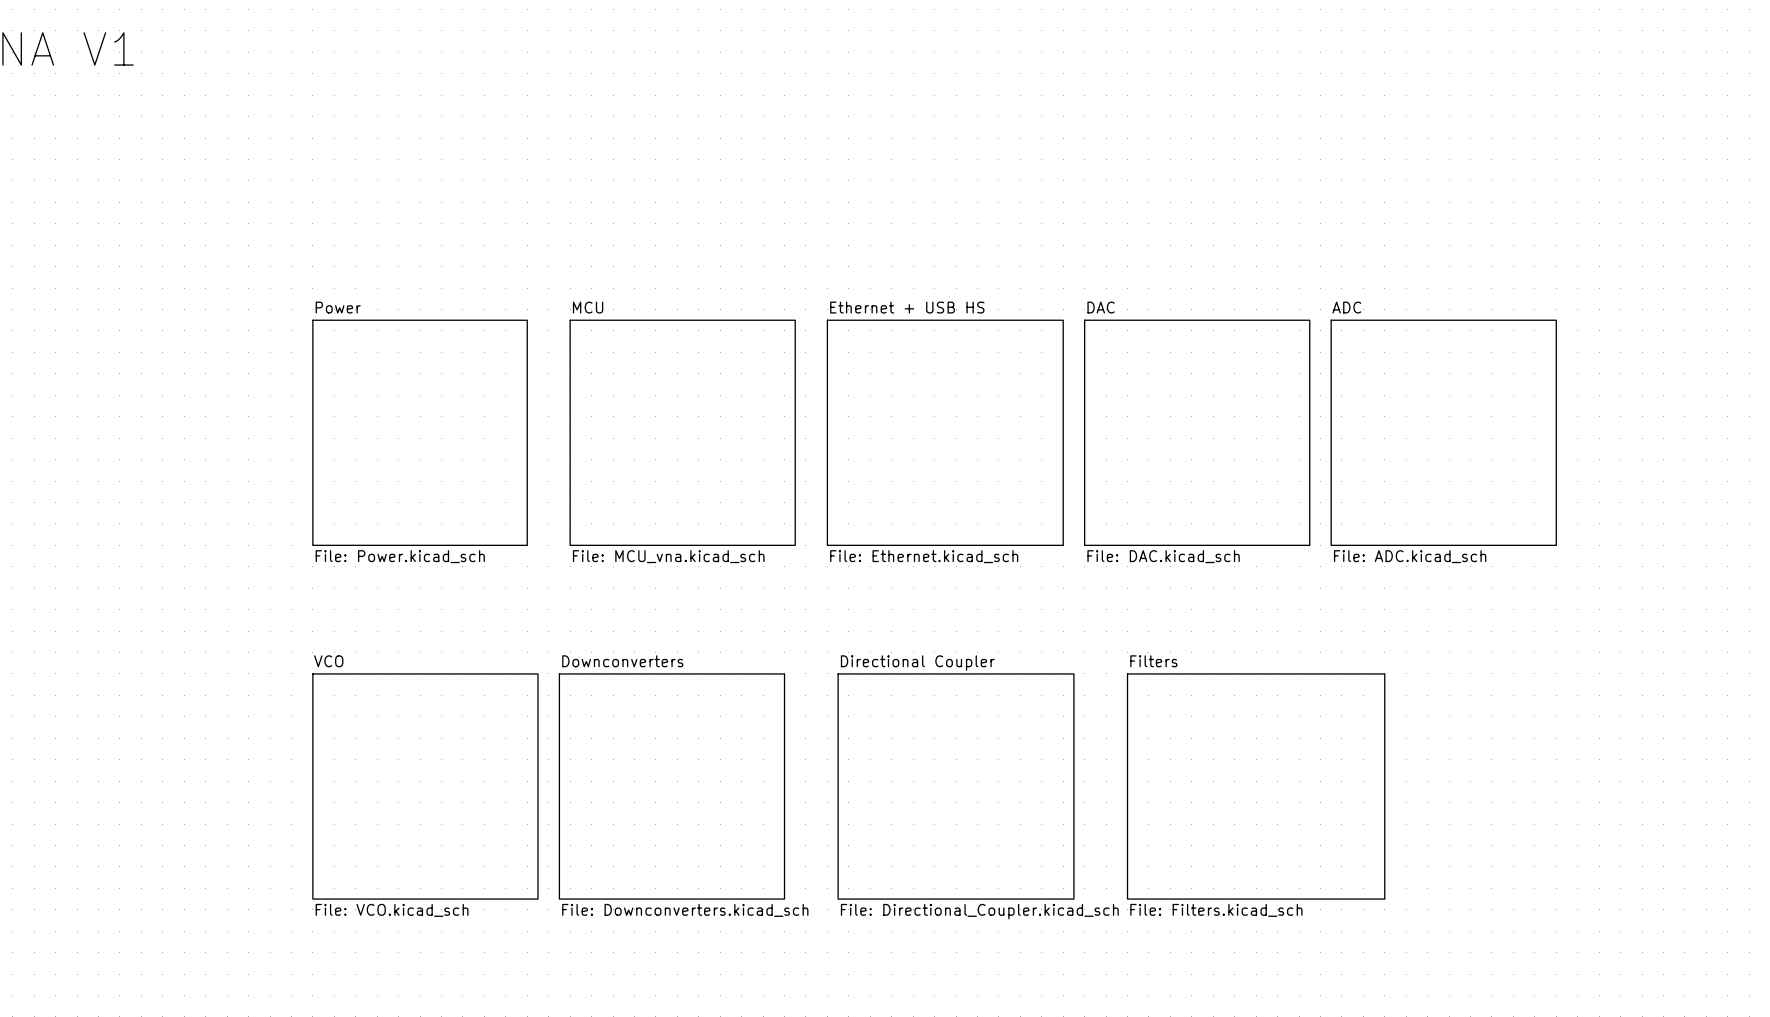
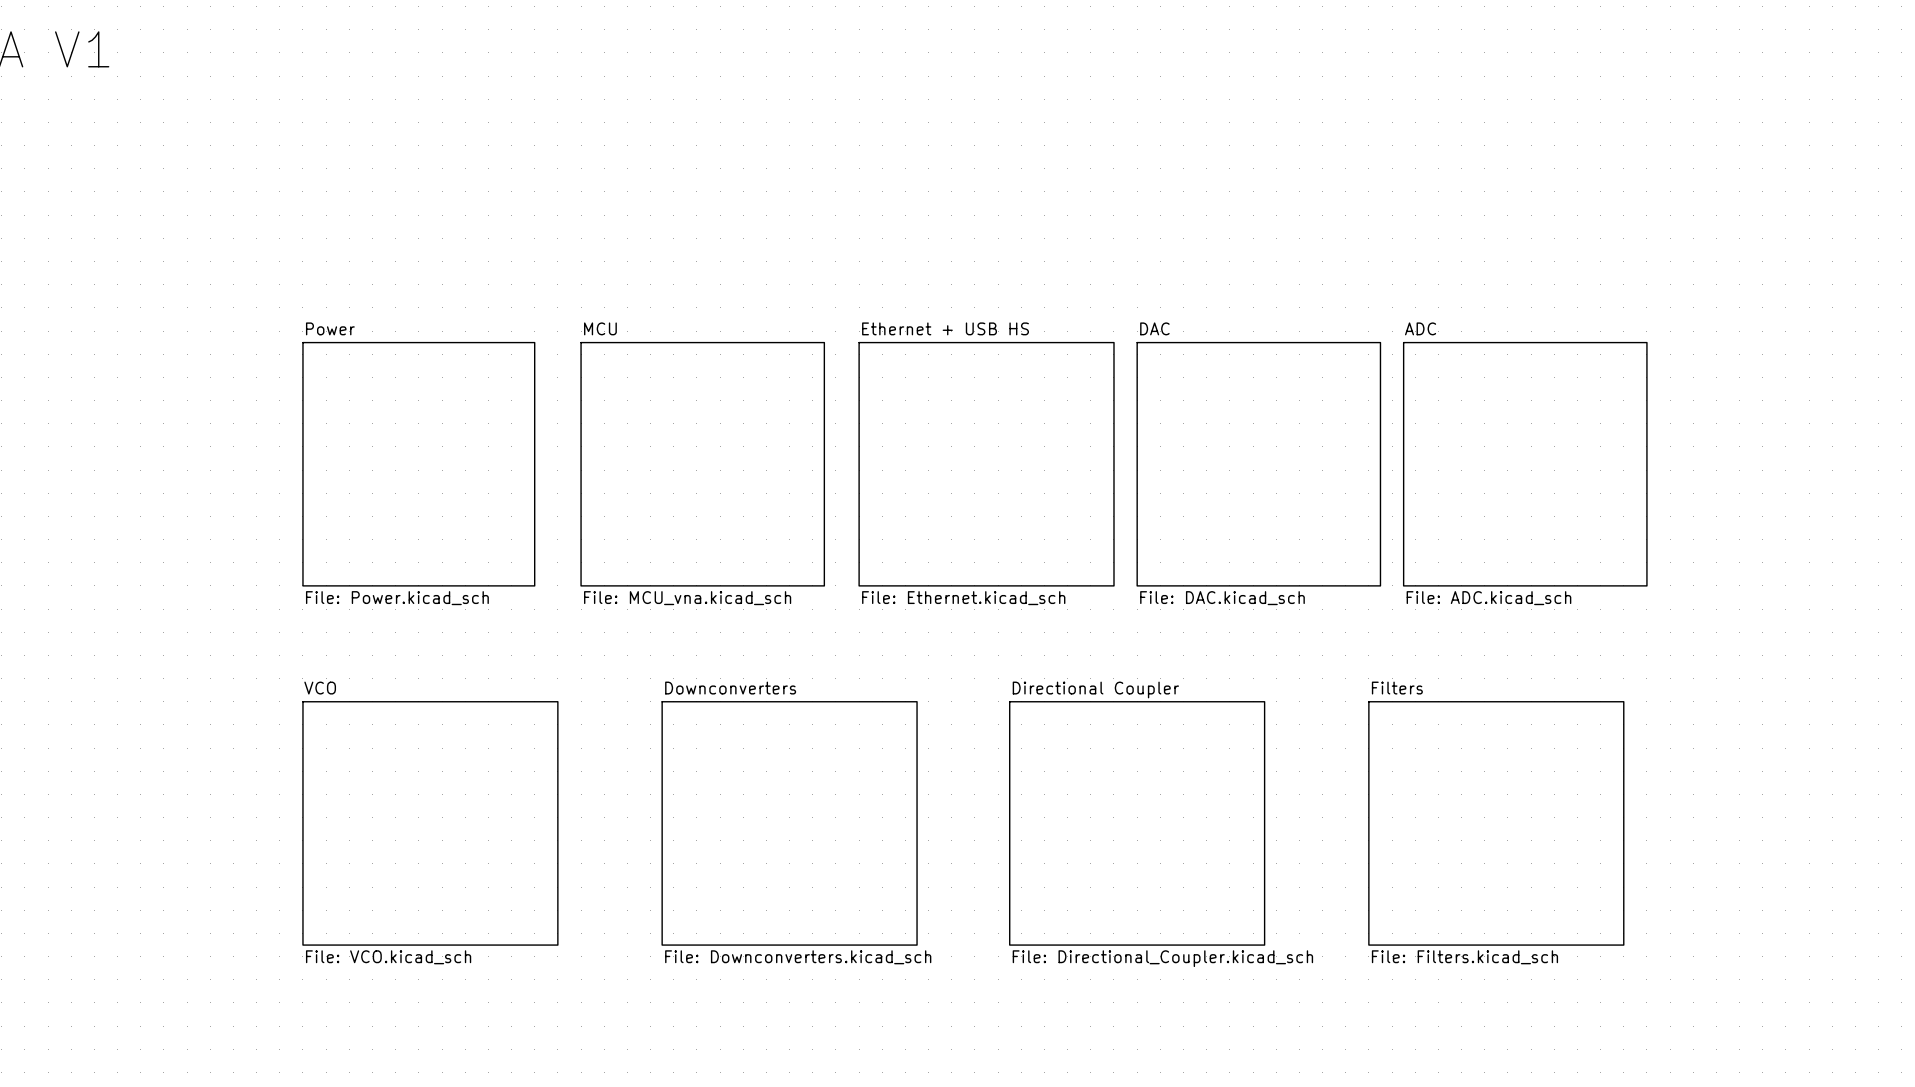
sheet VCO: none -> File: VCO.kicad_sch (430, 823)
sheet Downconverters: none -> File: Downconverters.kicad_sch (789, 823)
sheet Filters: none -> File: Filters.kicad_sch (1496, 823)
sheet VCO: File: VCO.kicad_sch (425, 786) -> none
sheet Downconverters: File: Downconverters.kicad_sch (671, 786) -> none
sheet Directional Coupler position: (956, 786) -> (1137, 823)
sheet Filters: File: Filters.kicad_sch (1256, 786) -> none

